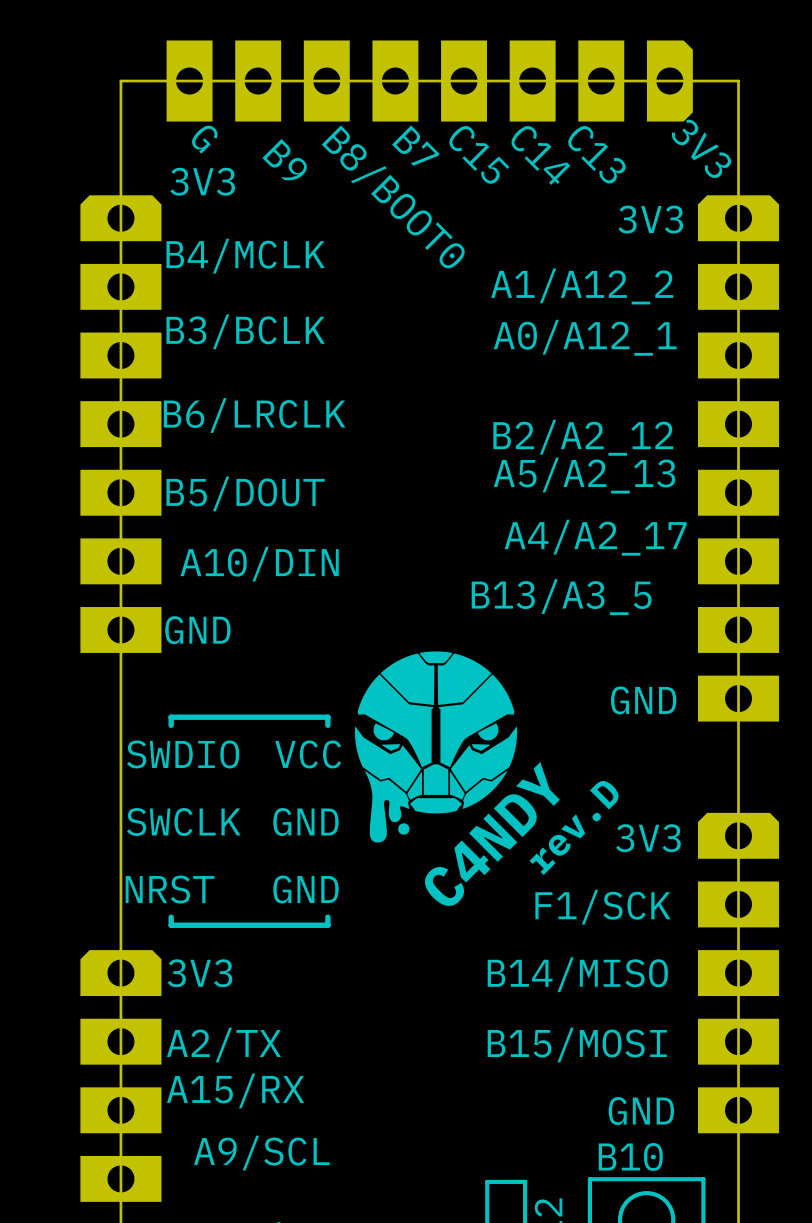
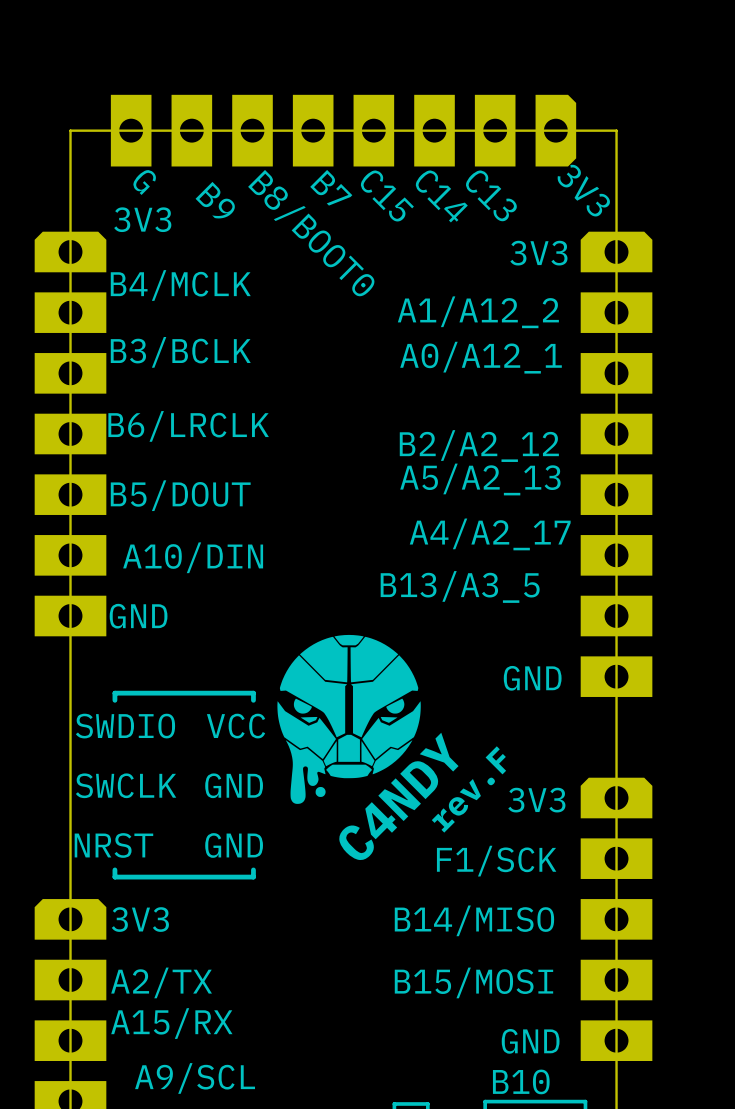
text: rev.D (574, 827) -> rev.F (468, 789)

